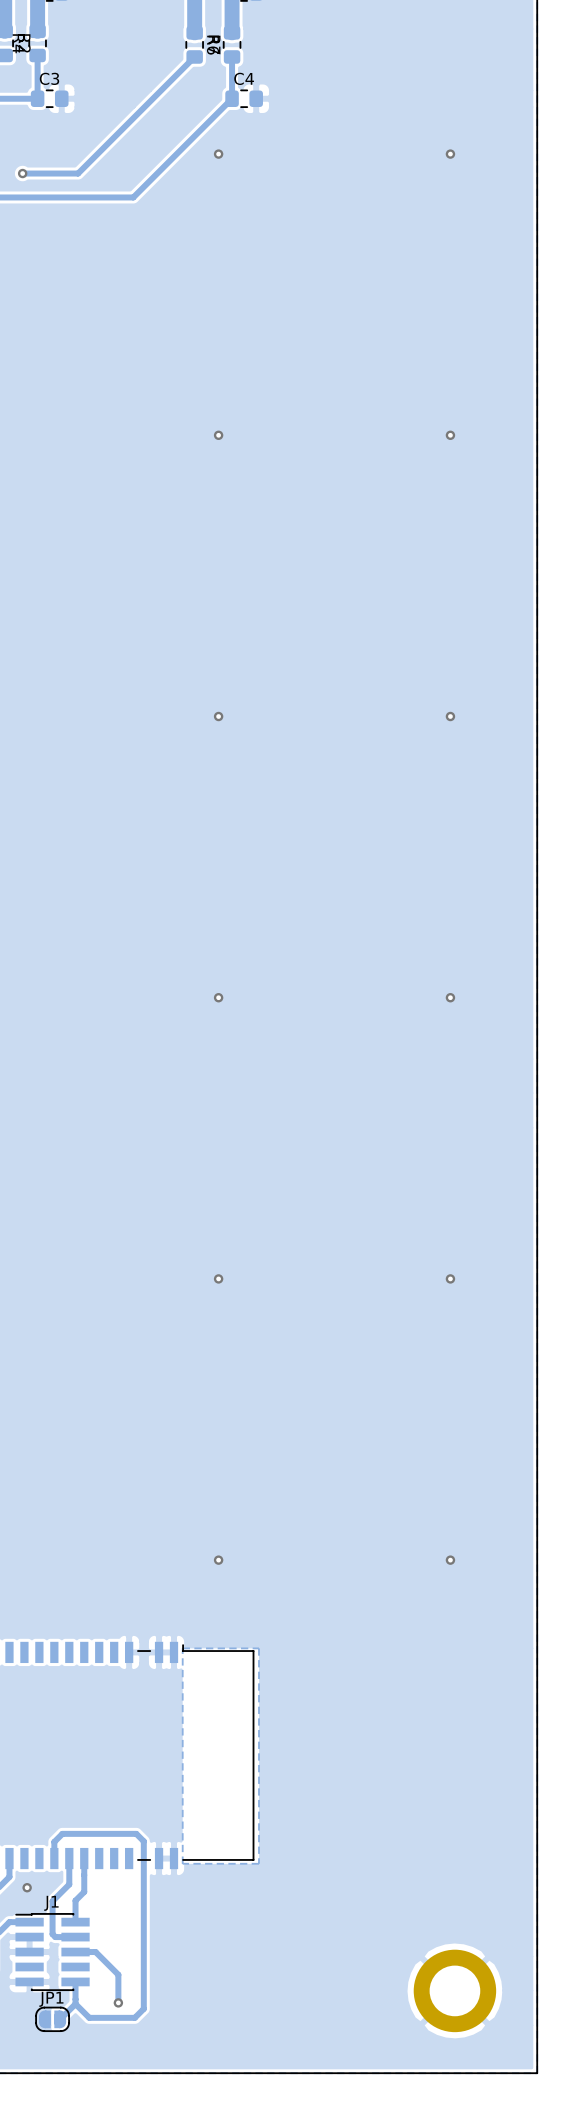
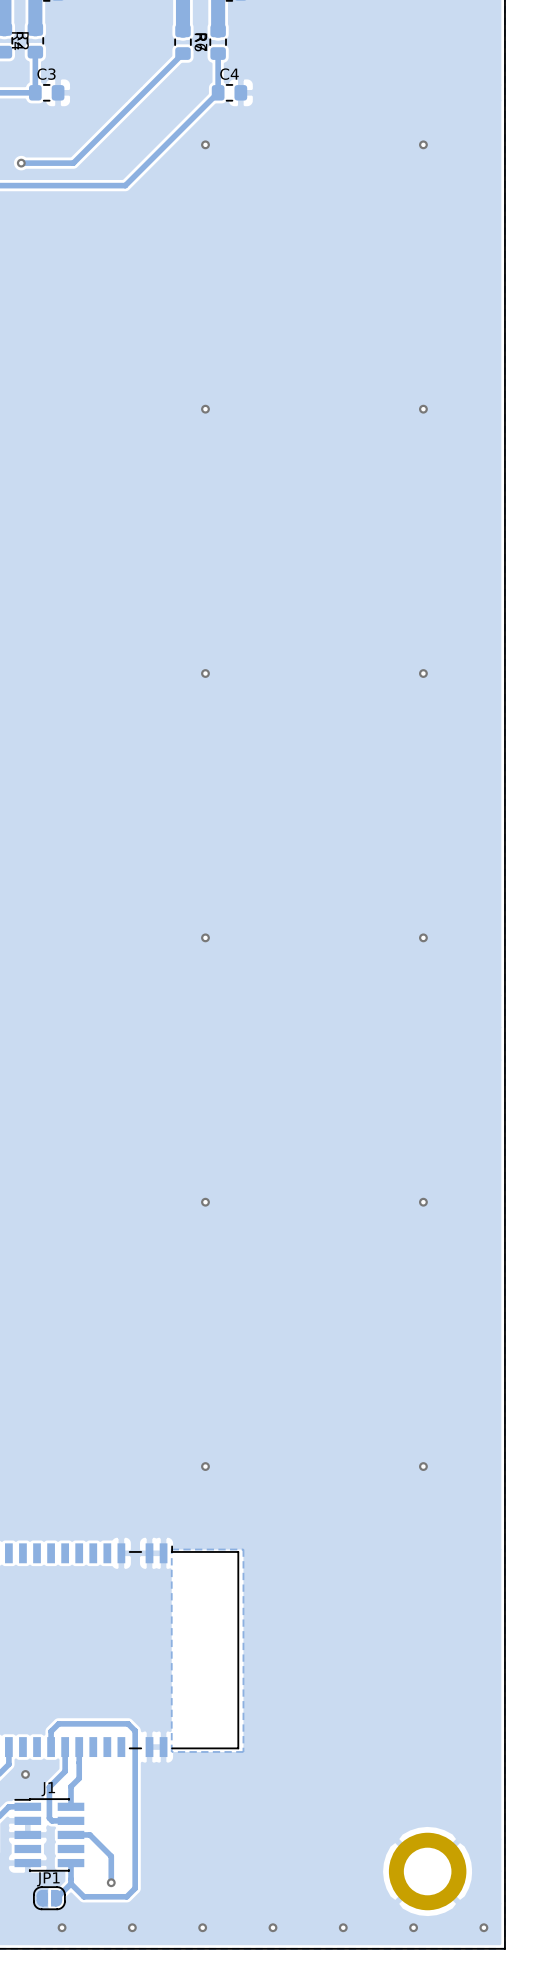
via: none -> (62, 1927)
via: none -> (132, 1927)
via: none -> (202, 1927)
via: none -> (272, 1927)
via: none -> (343, 1927)
via: none -> (413, 1927)
via: none -> (483, 1927)

